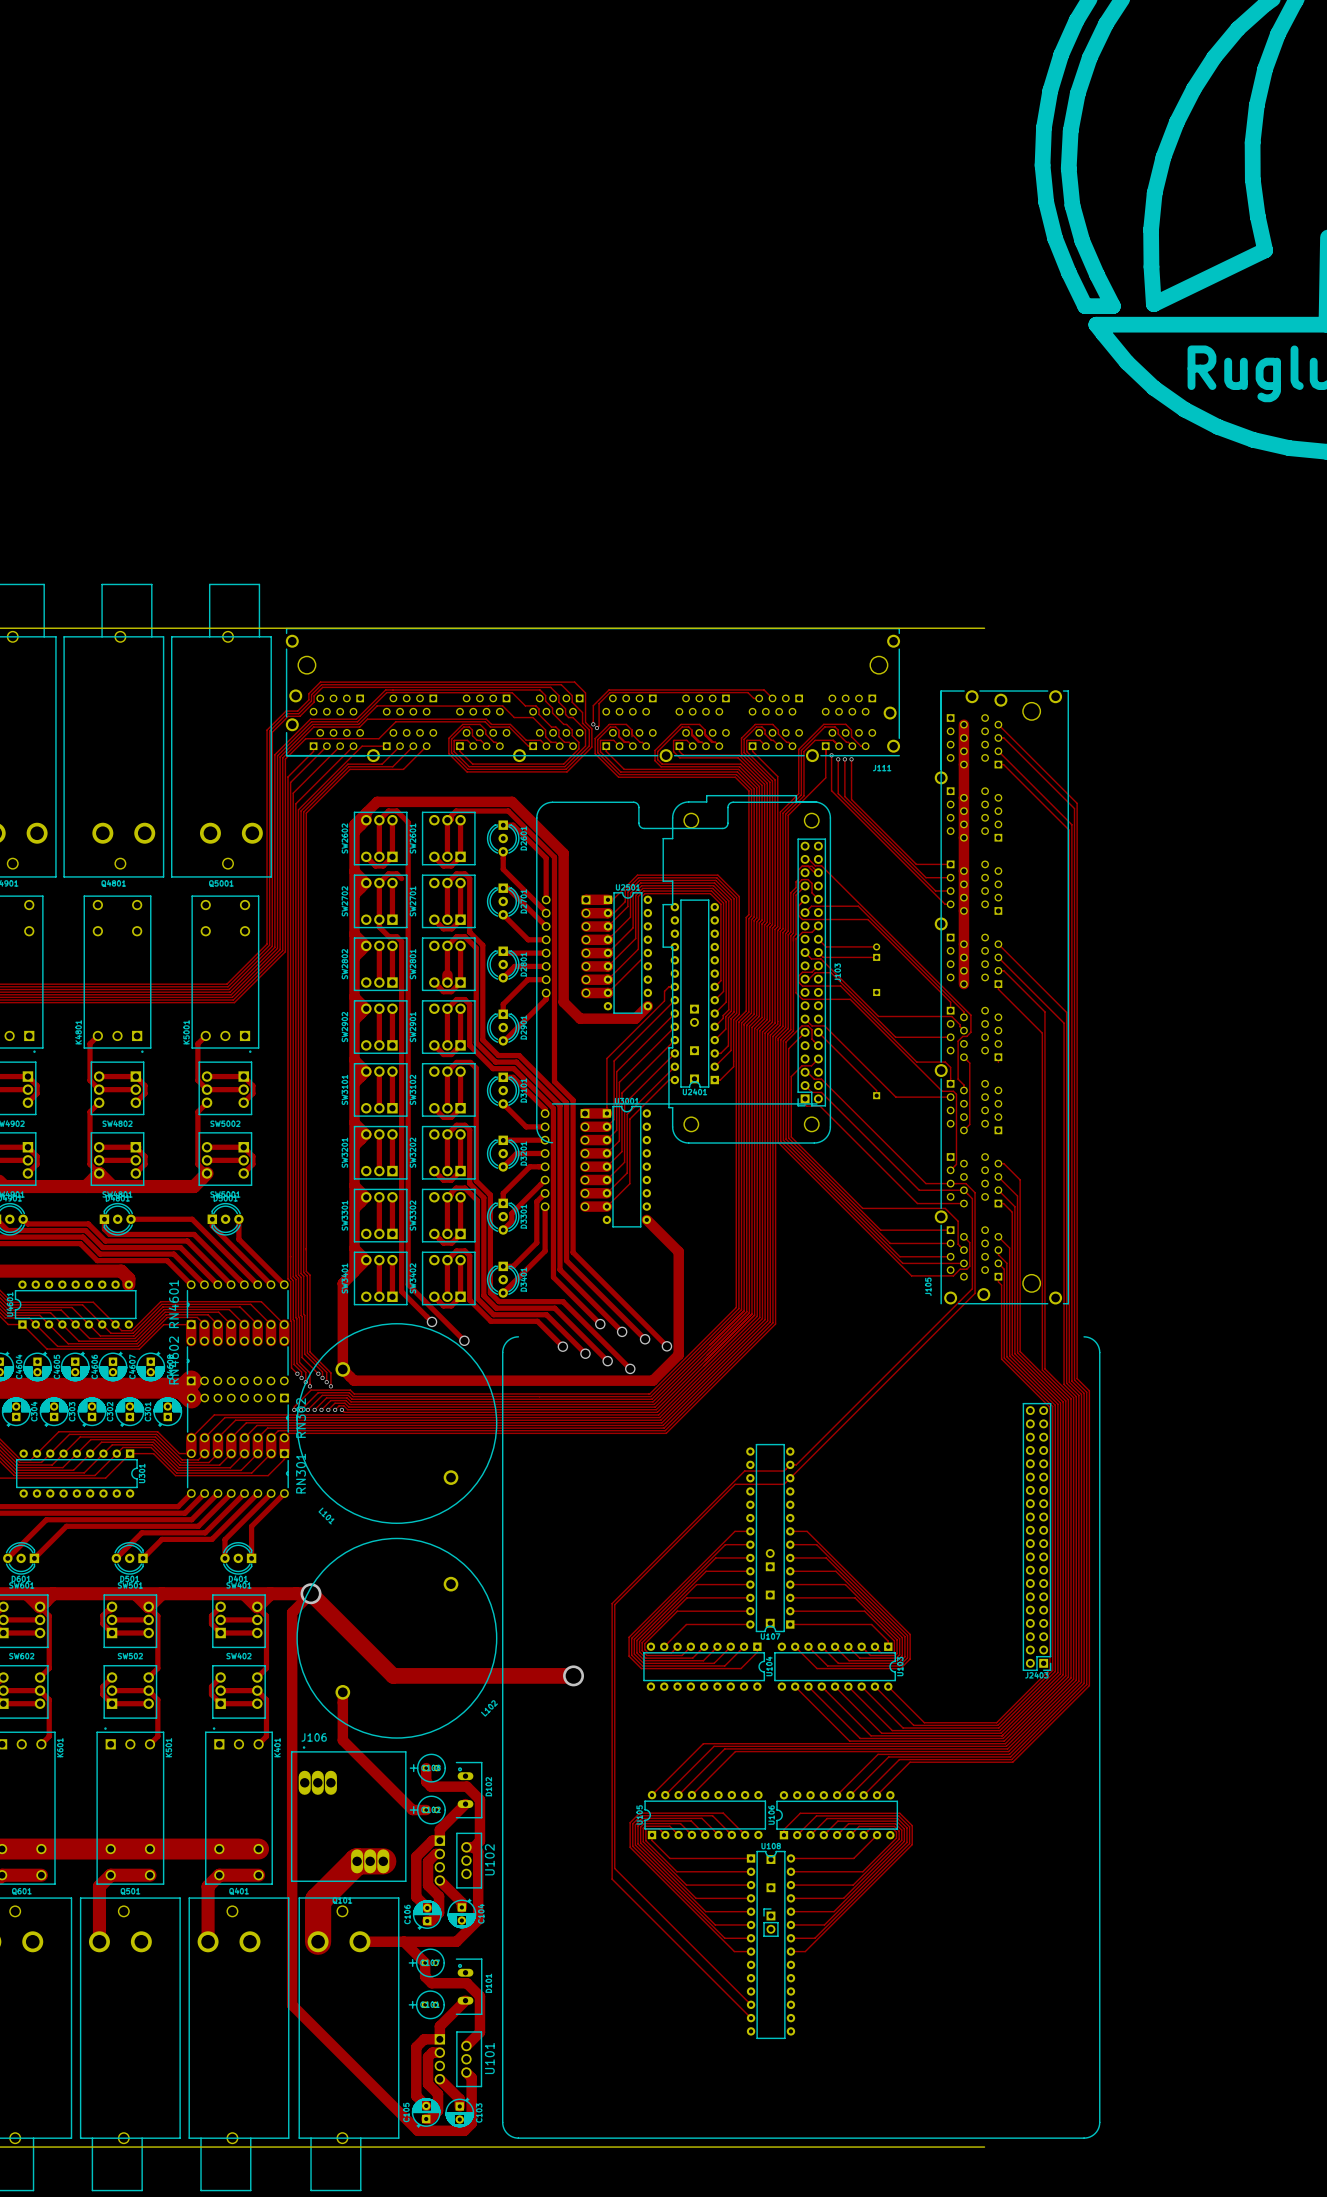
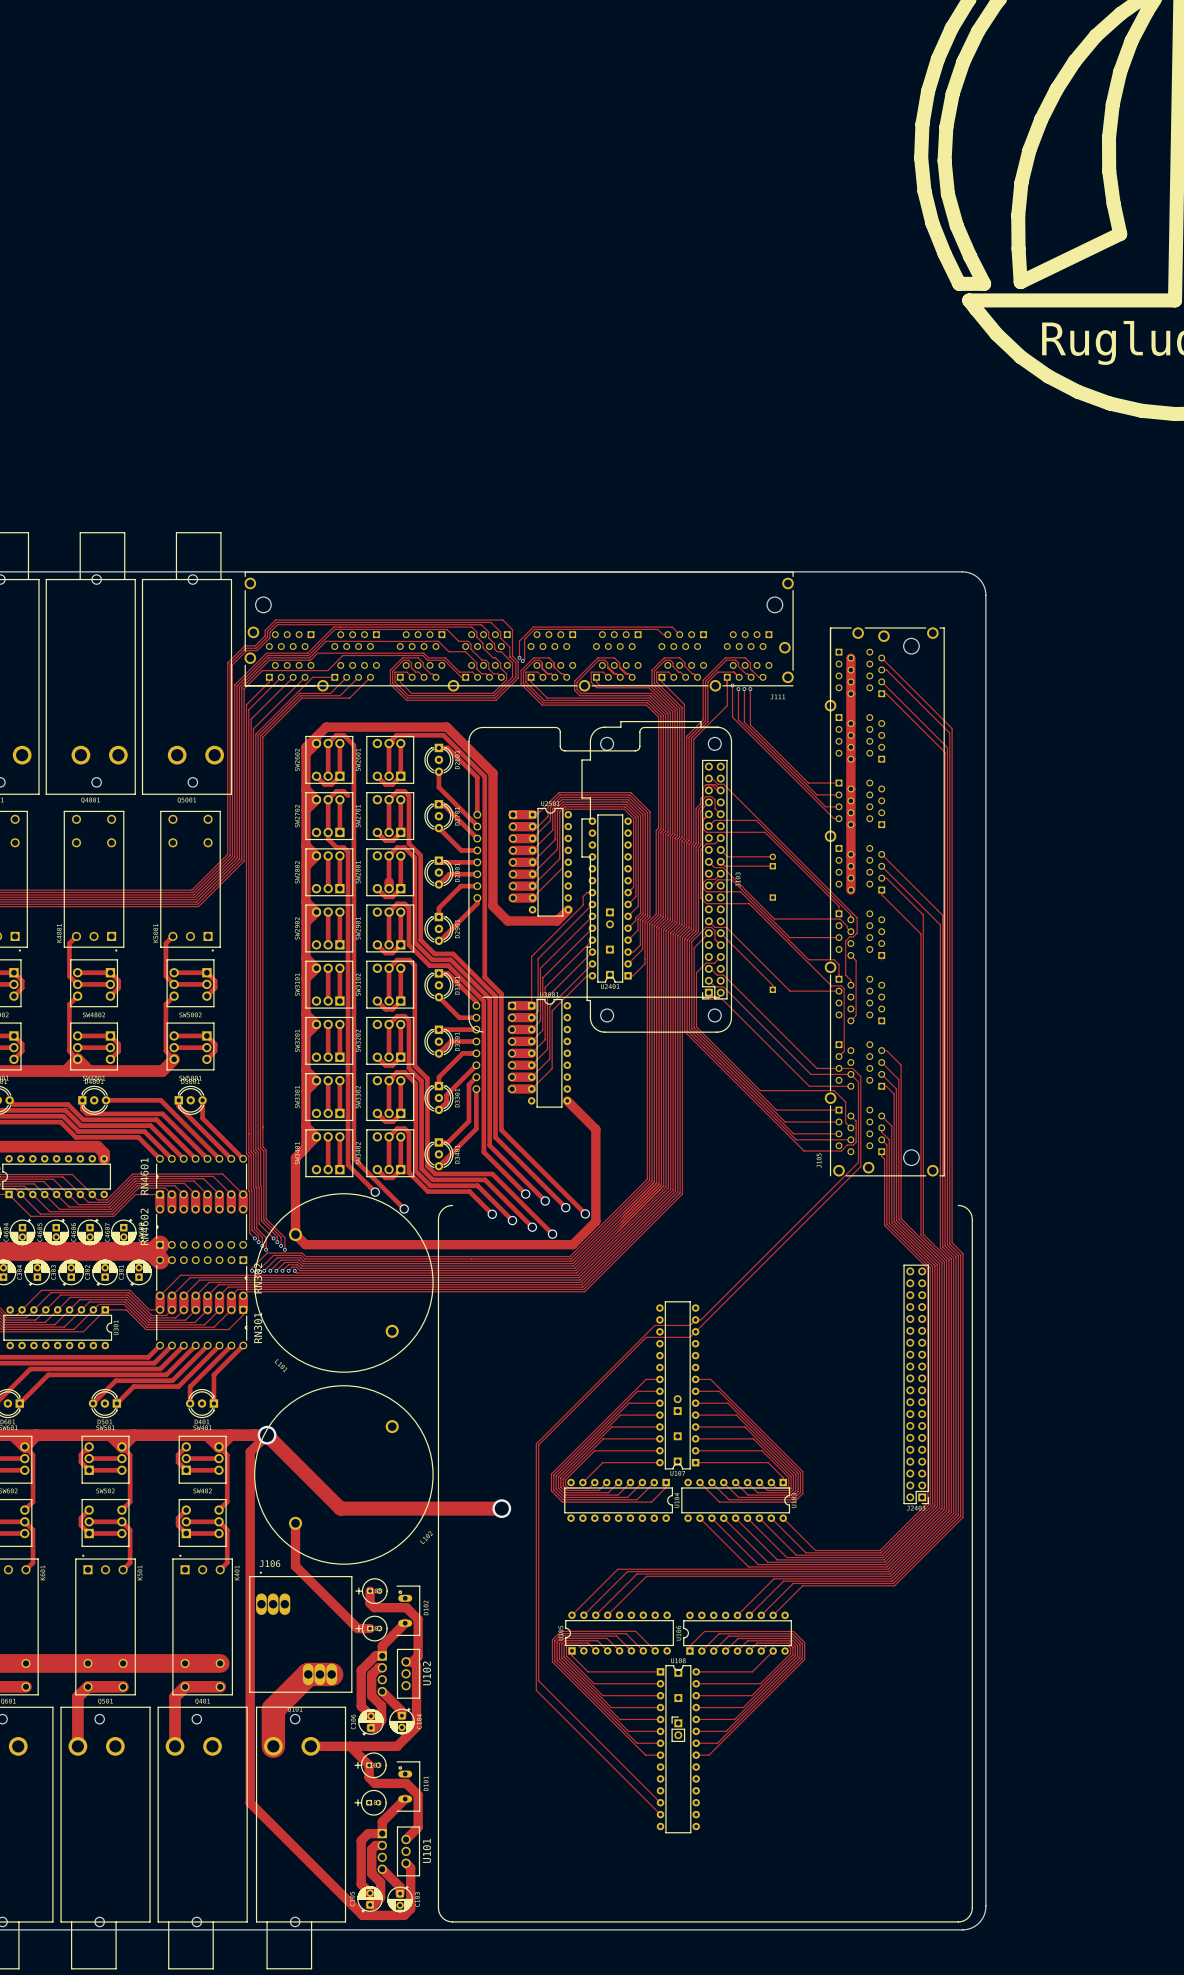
board edge: none -> (869, 571) (967, 572) (980, 580) (985, 595) (985, 1908) (979, 1922) (965, 1929) (869, 1929)

